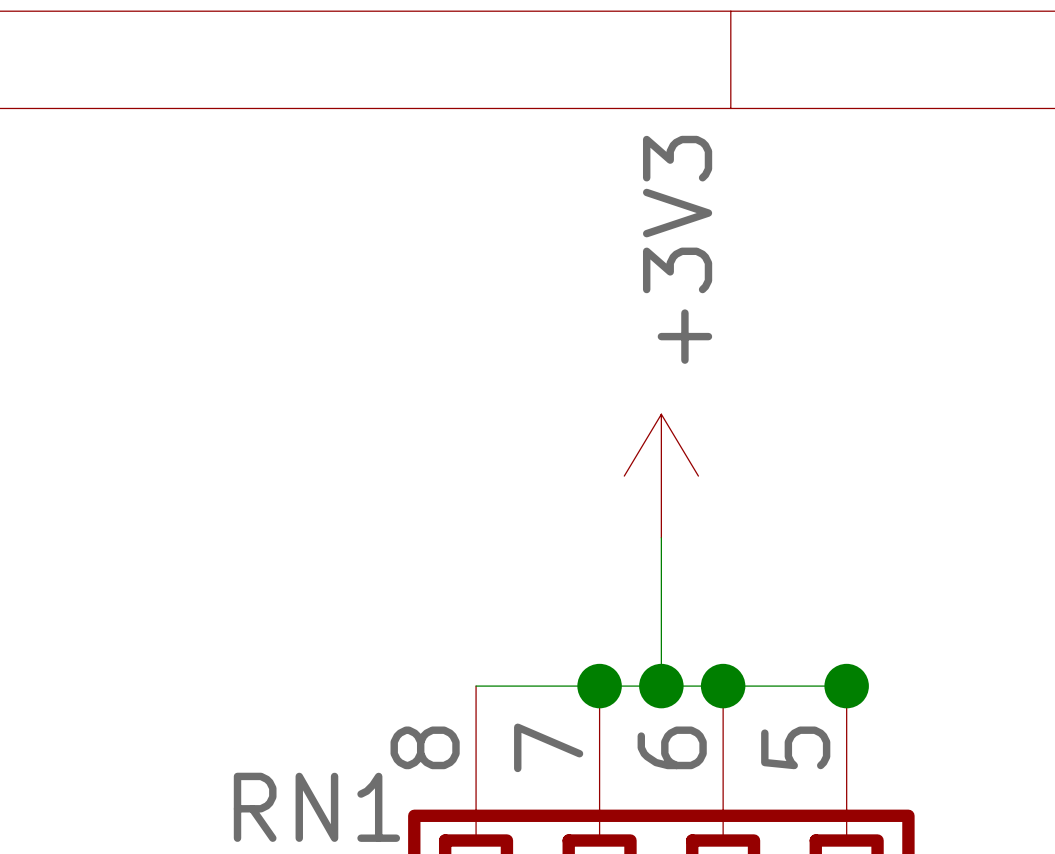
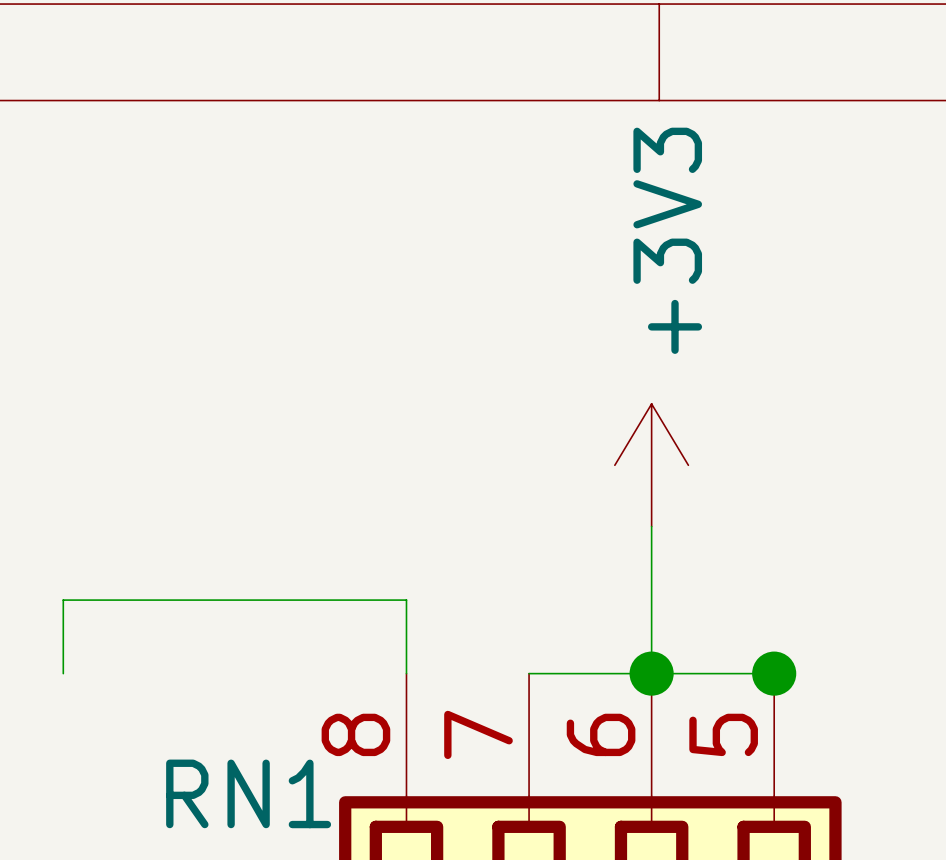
power symbol position: +3V3 (661, 476) -> +3V3 (651, 465)
wire: (661, 537) (661, 686) -> (651, 526) (651, 673)
wire: (476, 686) (599, 686) -> (406, 673) (406, 600) (63, 600) (63, 673)
junction: (599, 686) -> none
junction: (661, 686) -> none

